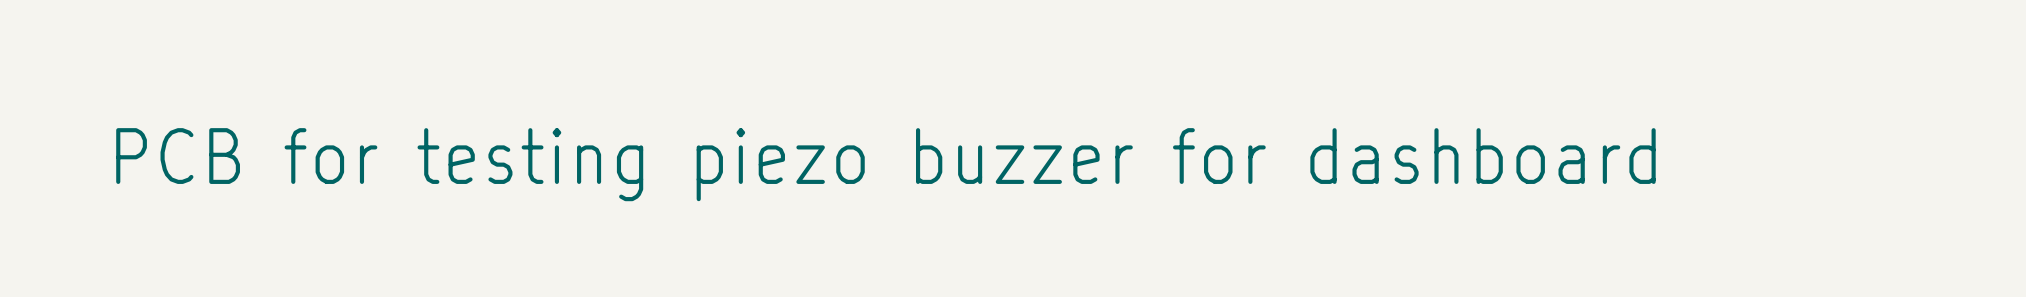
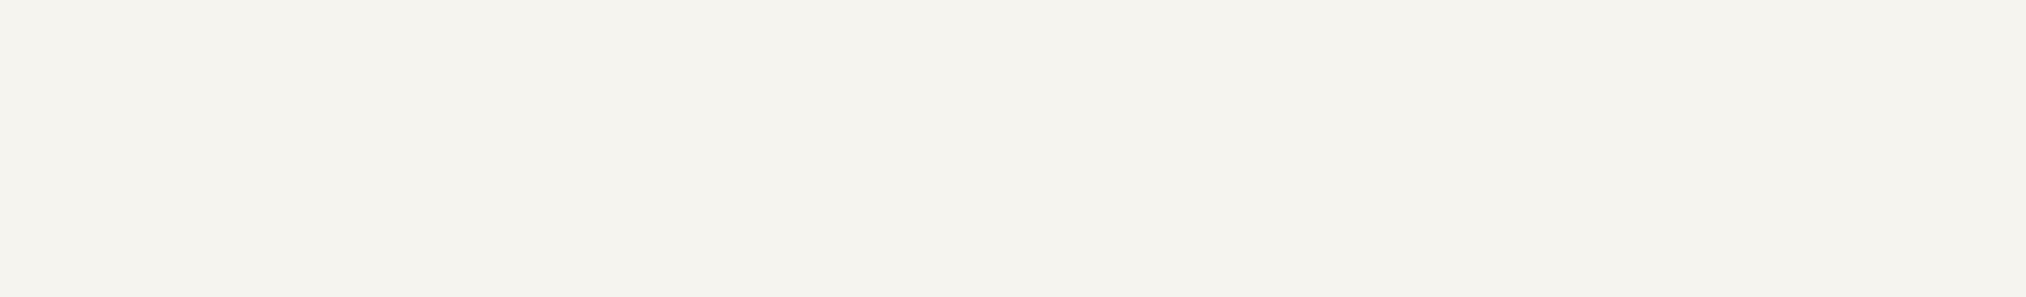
text: PCB for testing piezo buzzer for dashboard (885, 164) -> none

